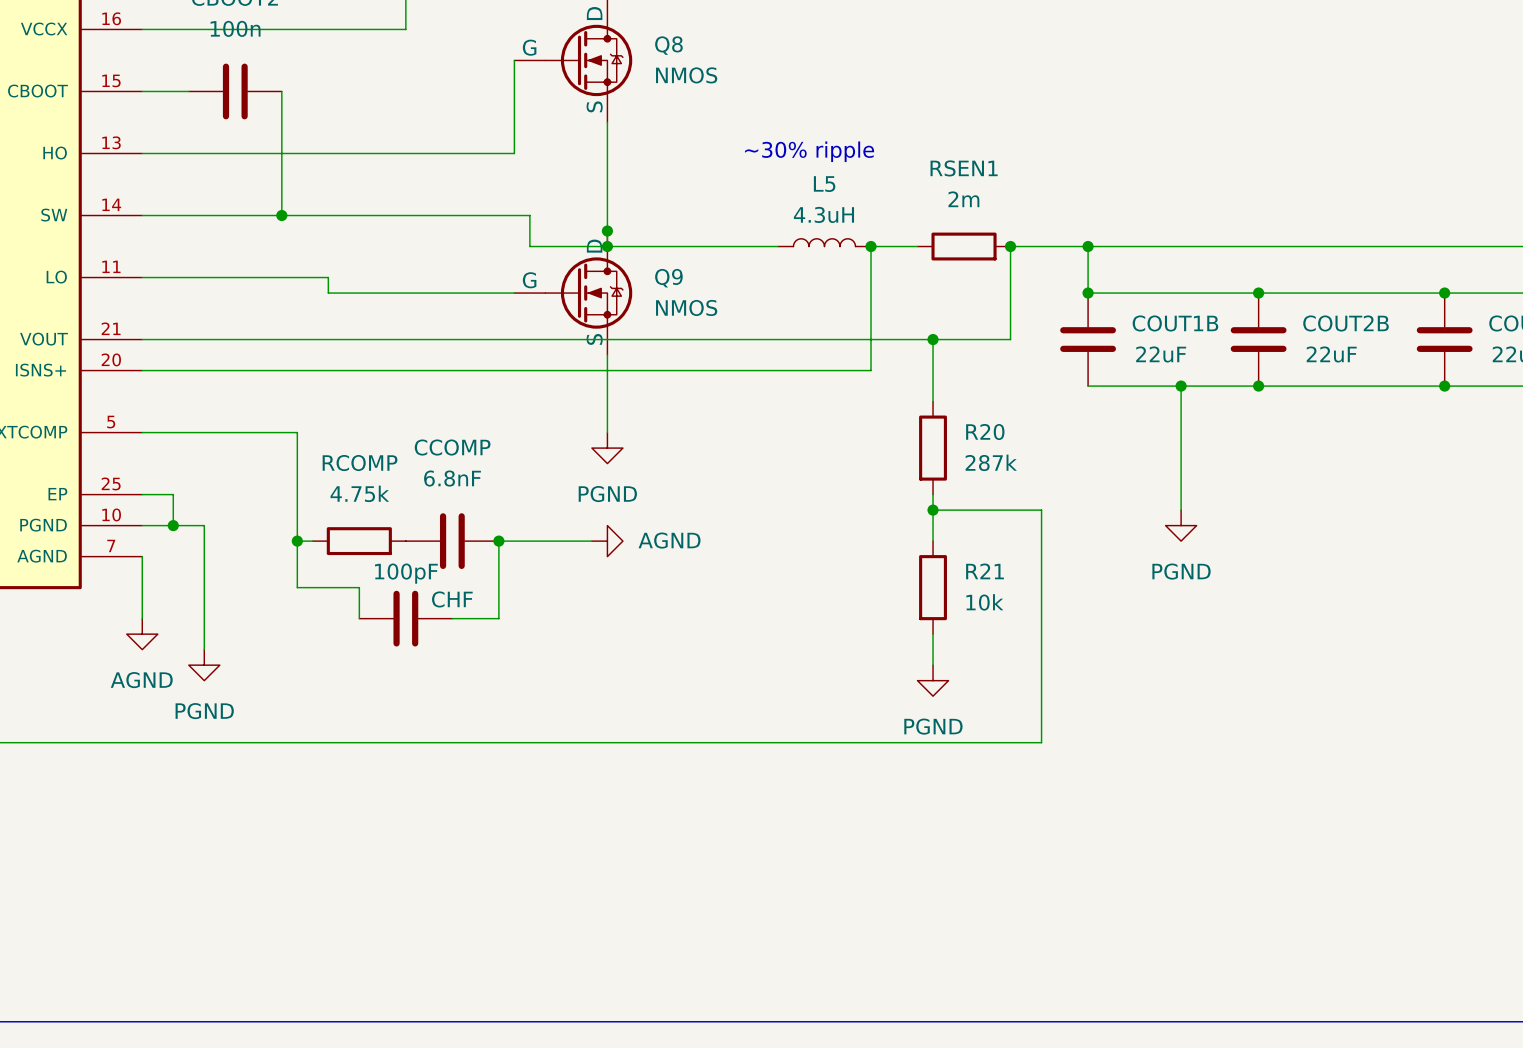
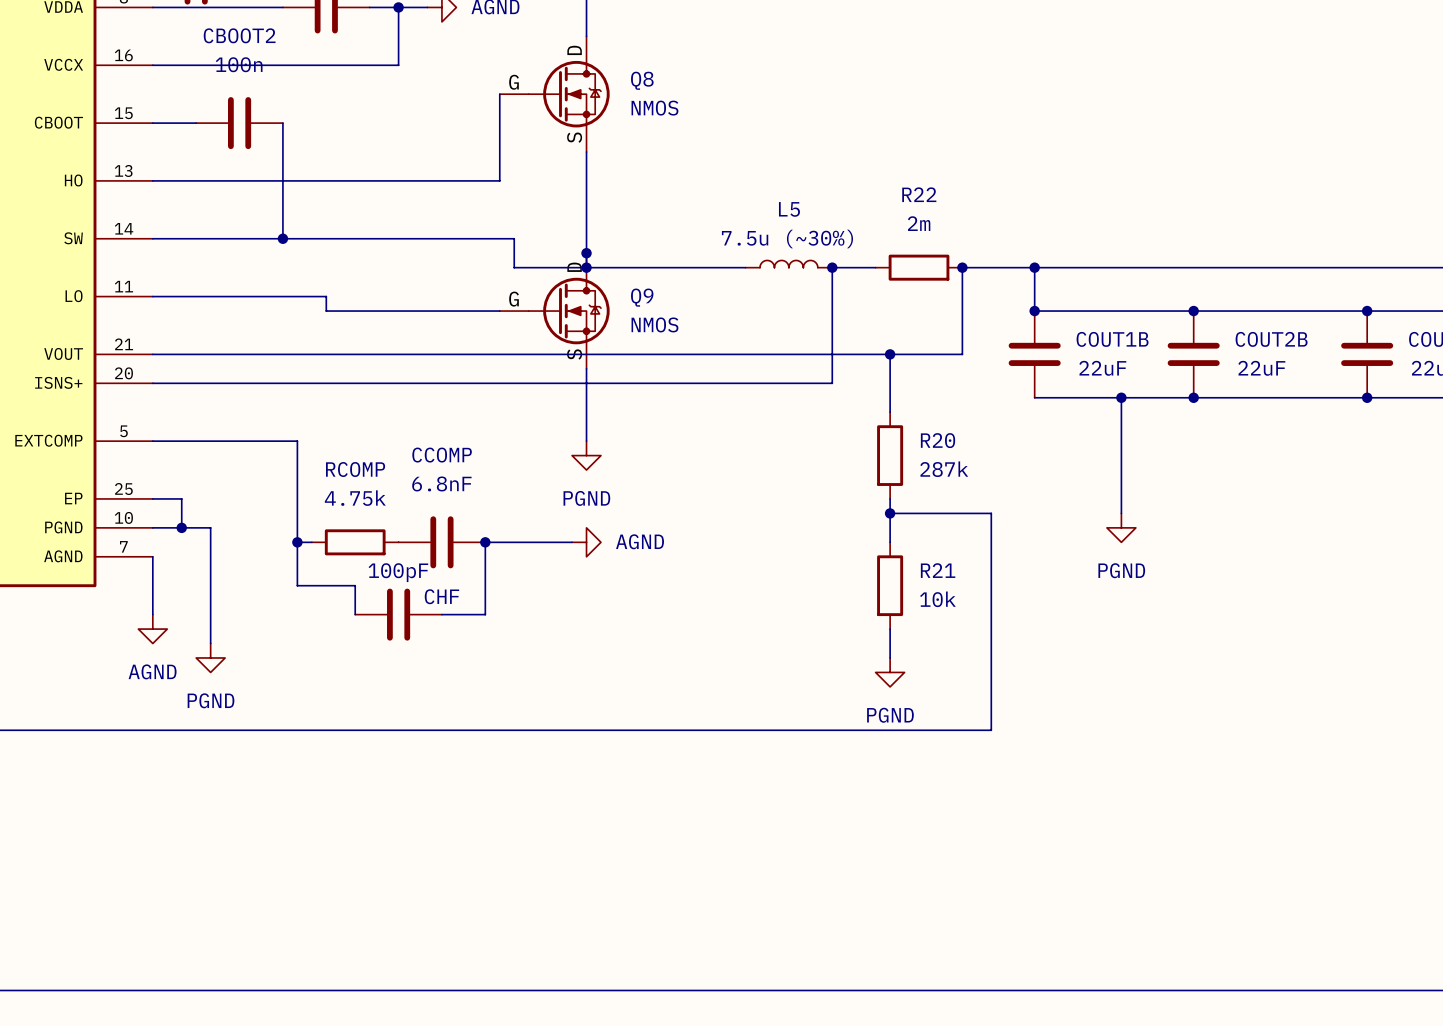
text: ~30% ripple (809, 151) -> none
RSEN1 name: RSEN1 (964, 168) -> R22 (919, 194)
L5 value: 4.3uH (823, 214) -> 7.5u (~30%) (787, 238)

